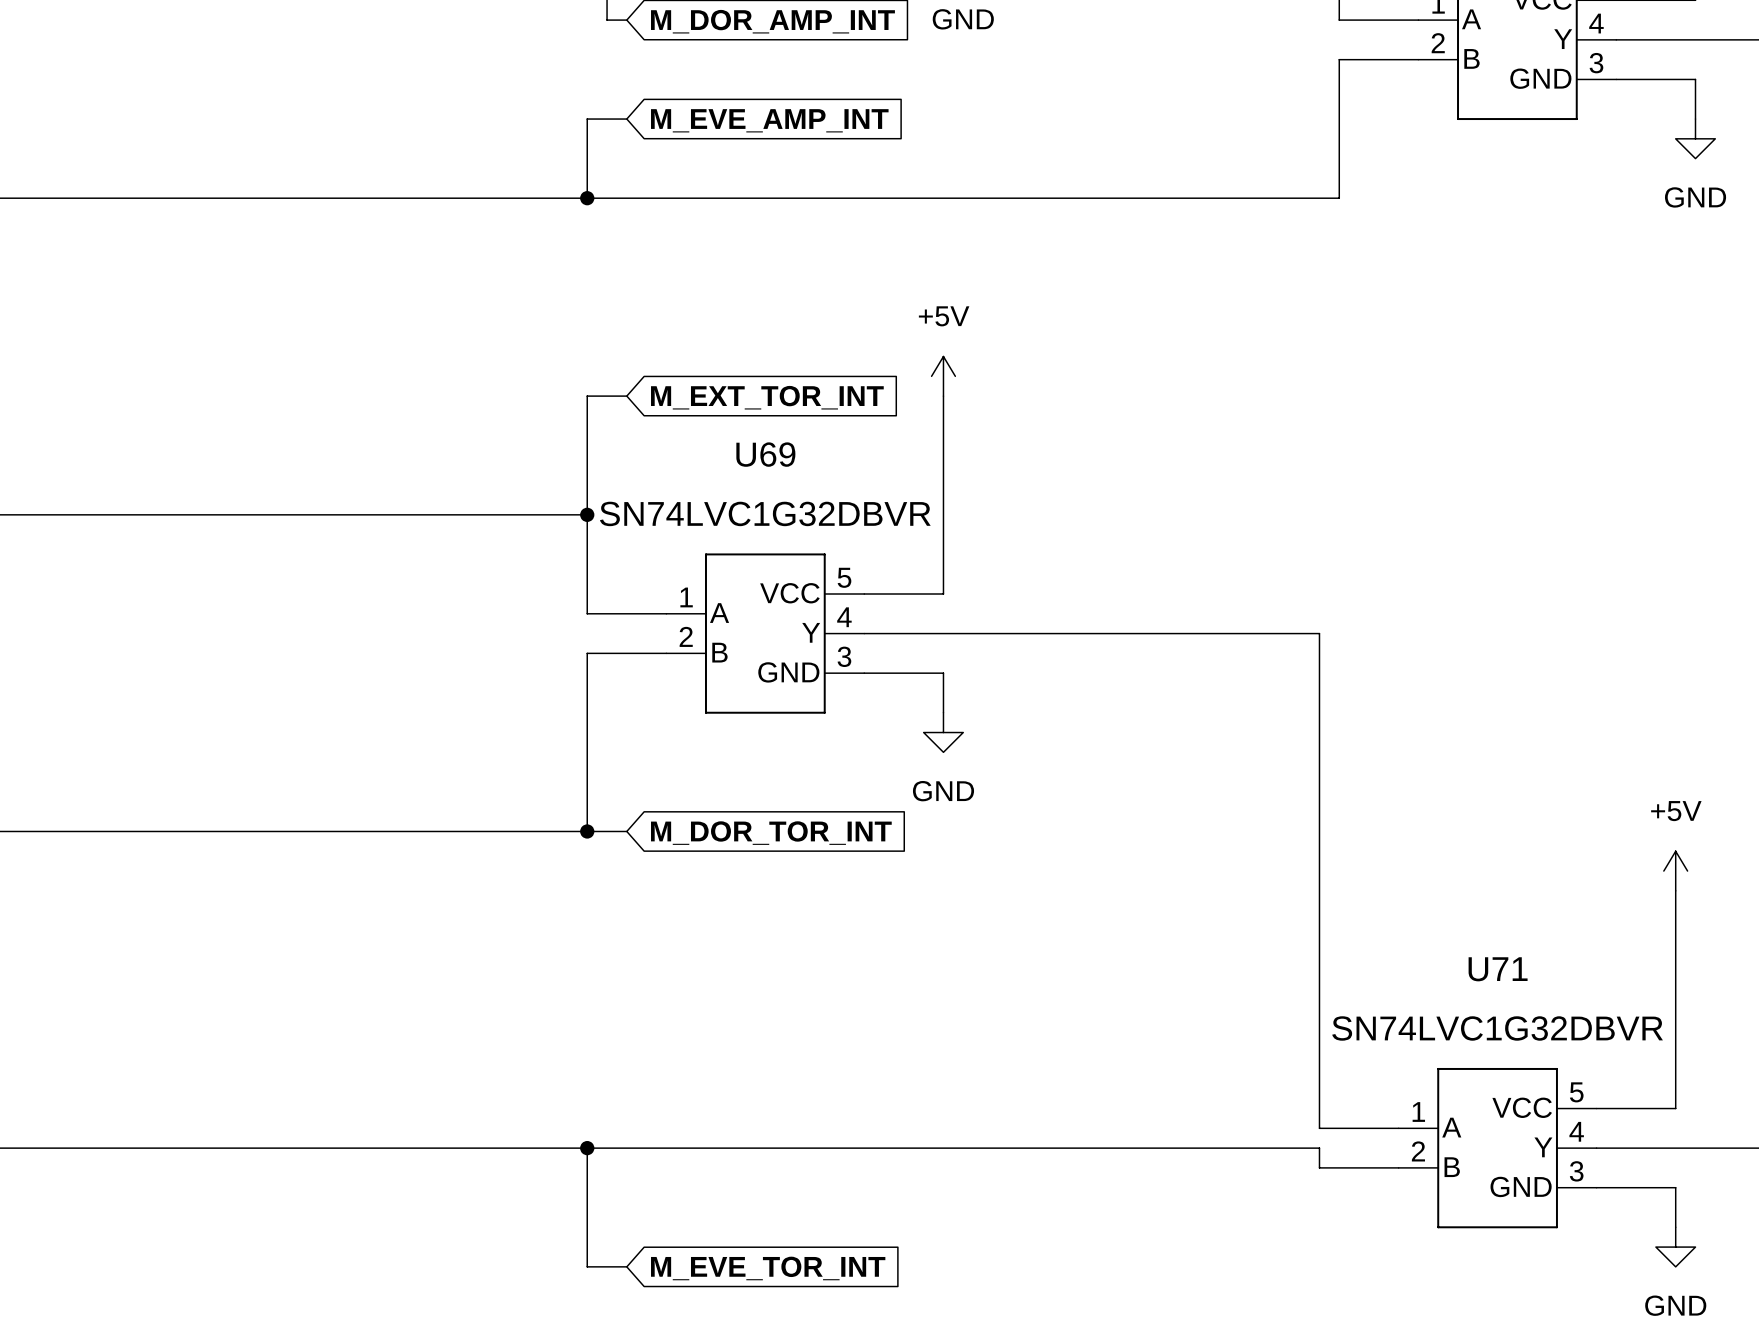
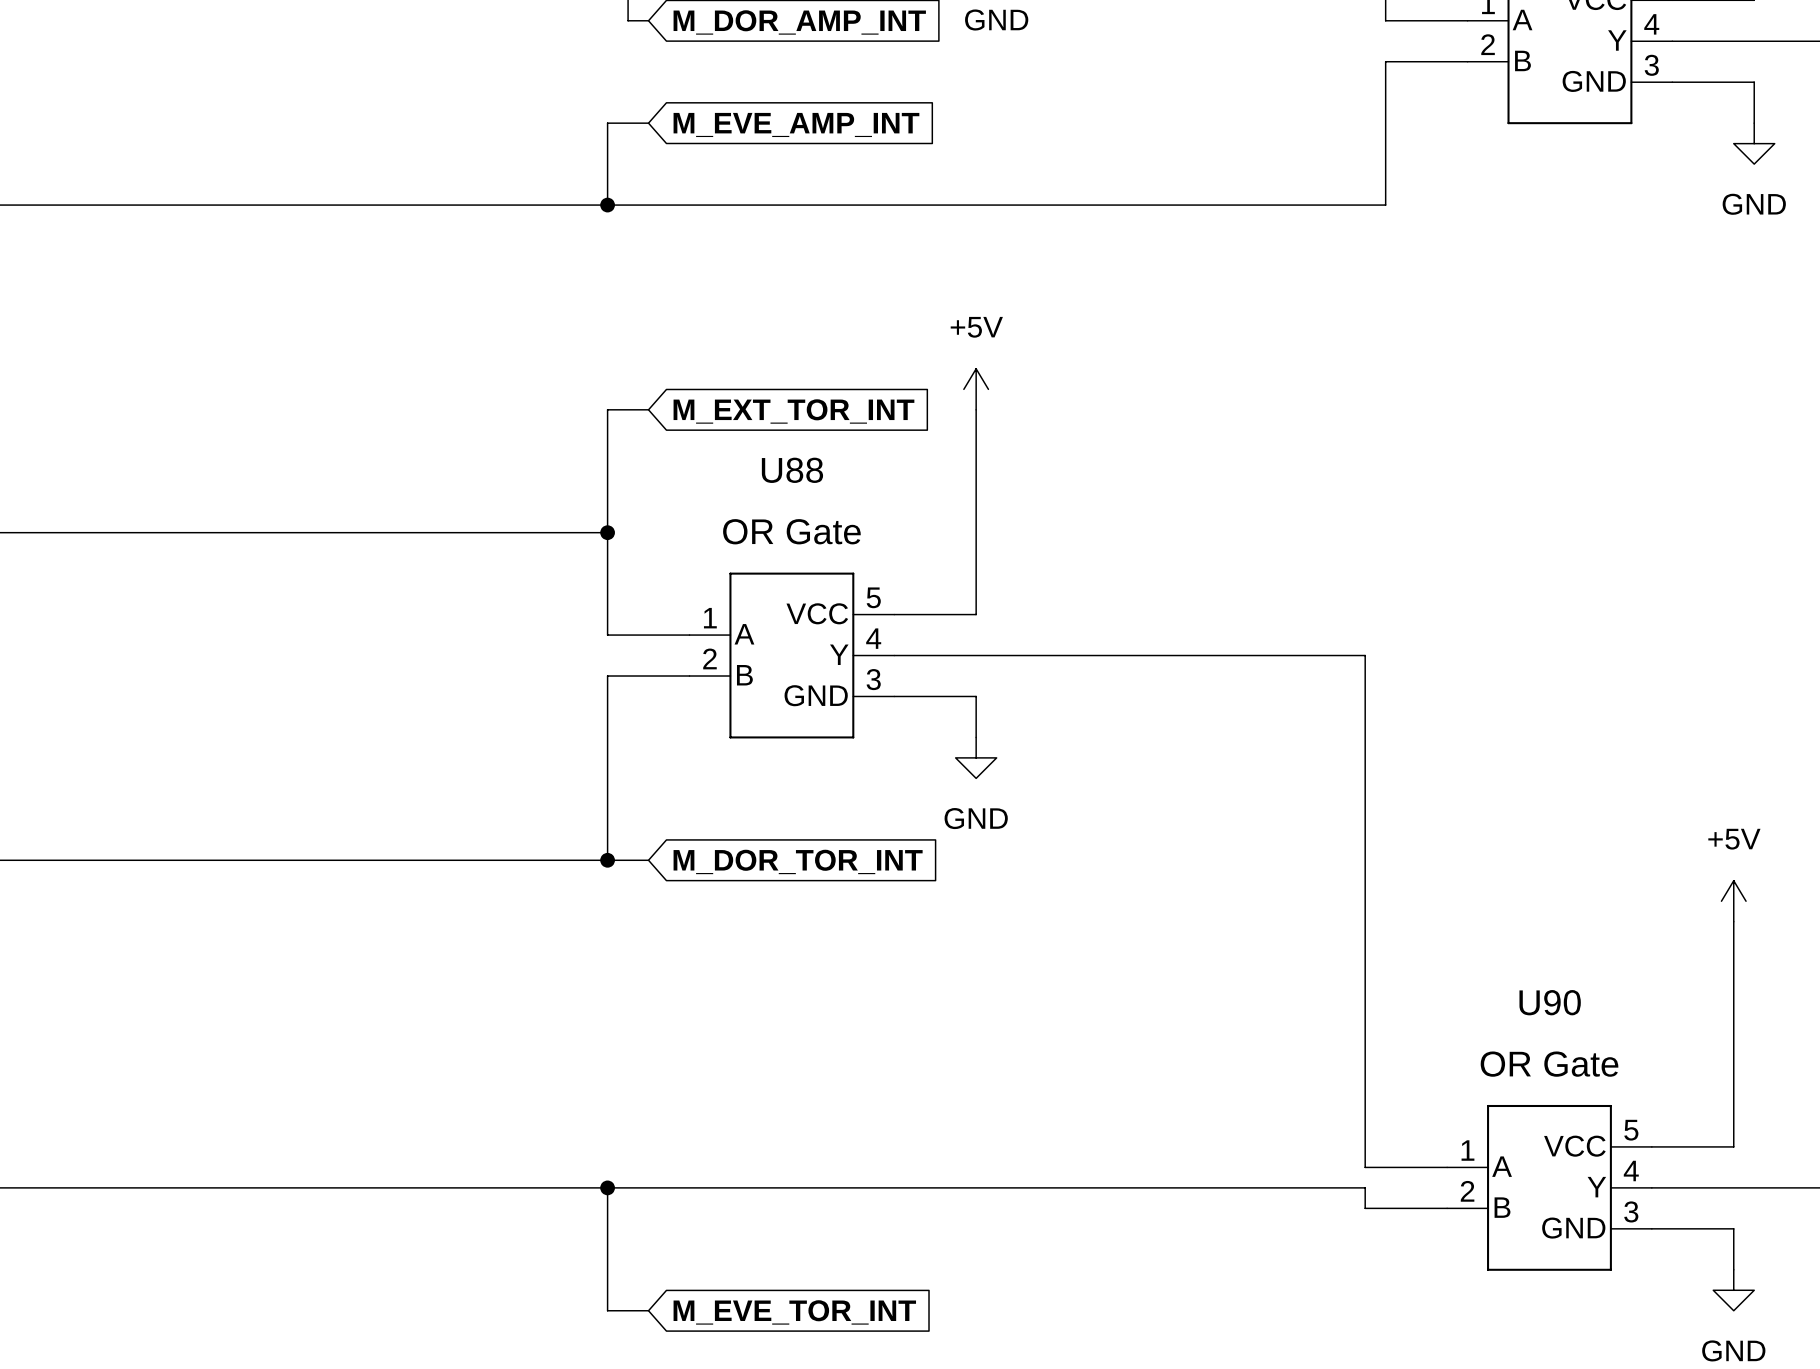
U69 name: U69 (765, 454) -> U88 (792, 470)
U69 value: SN74LVC1G32DBVR (765, 513) -> OR Gate (791, 531)
U71 name: U71 (1498, 969) -> U90 (1550, 1002)
U71 value: SN74LVC1G32DBVR (1497, 1028) -> OR Gate (1549, 1064)

